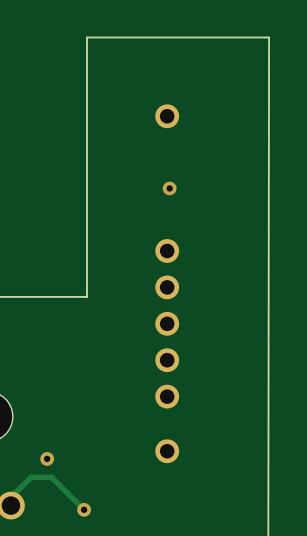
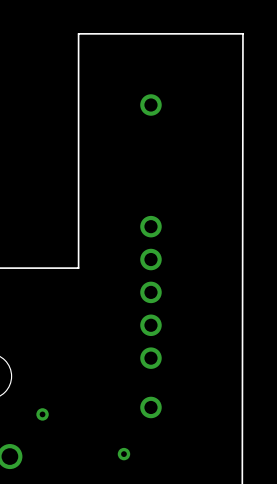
via: (169, 188) -> none
track: (10, 505) (10, 497) (30, 477) (51, 477) (84, 509) -> none
via position: (84, 509) -> (123, 454)

